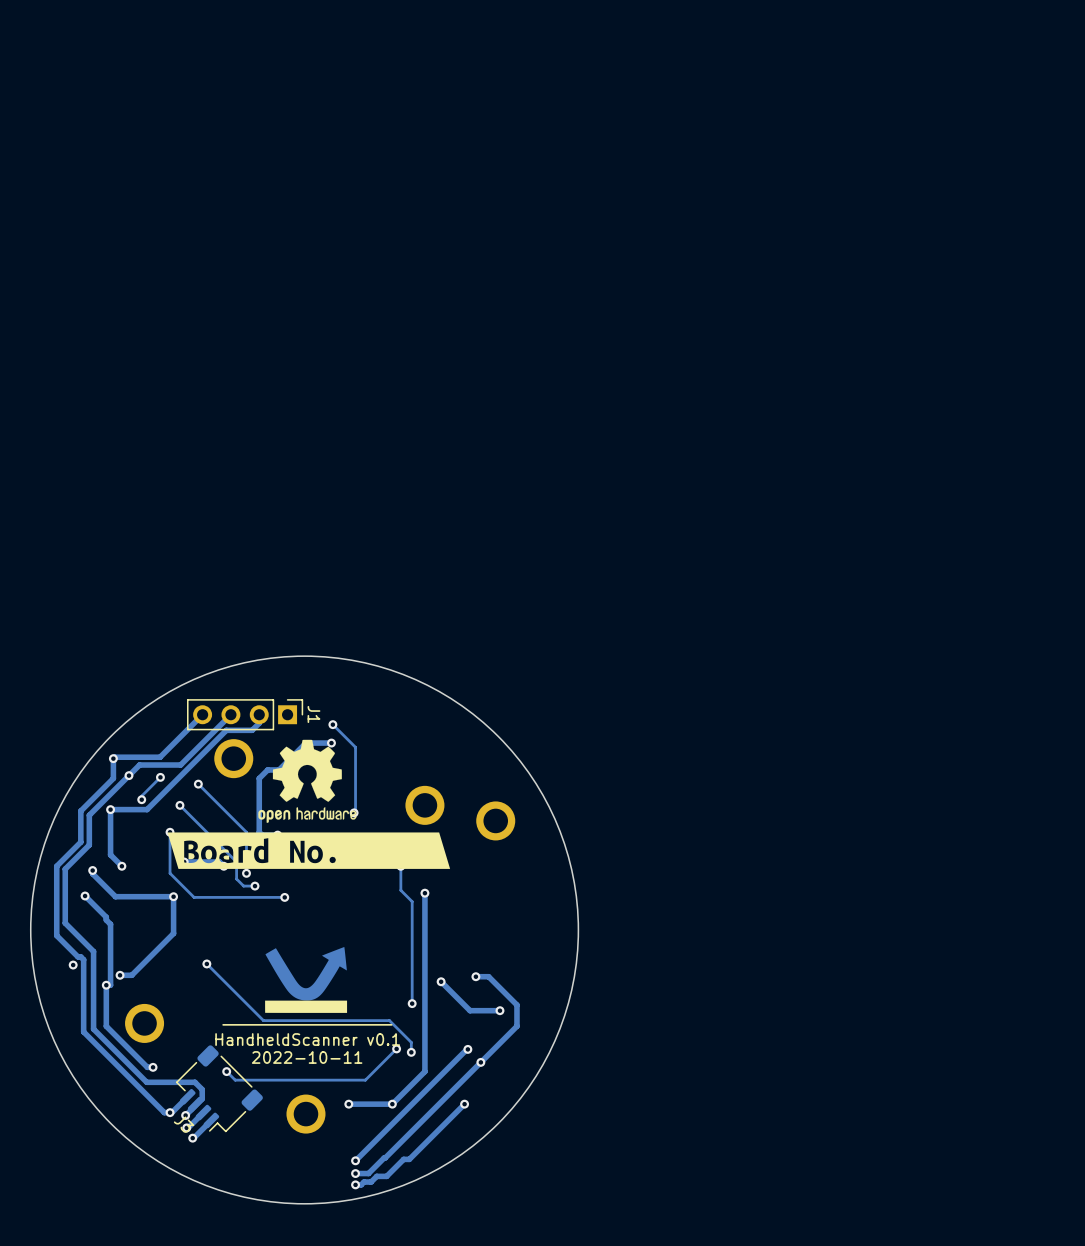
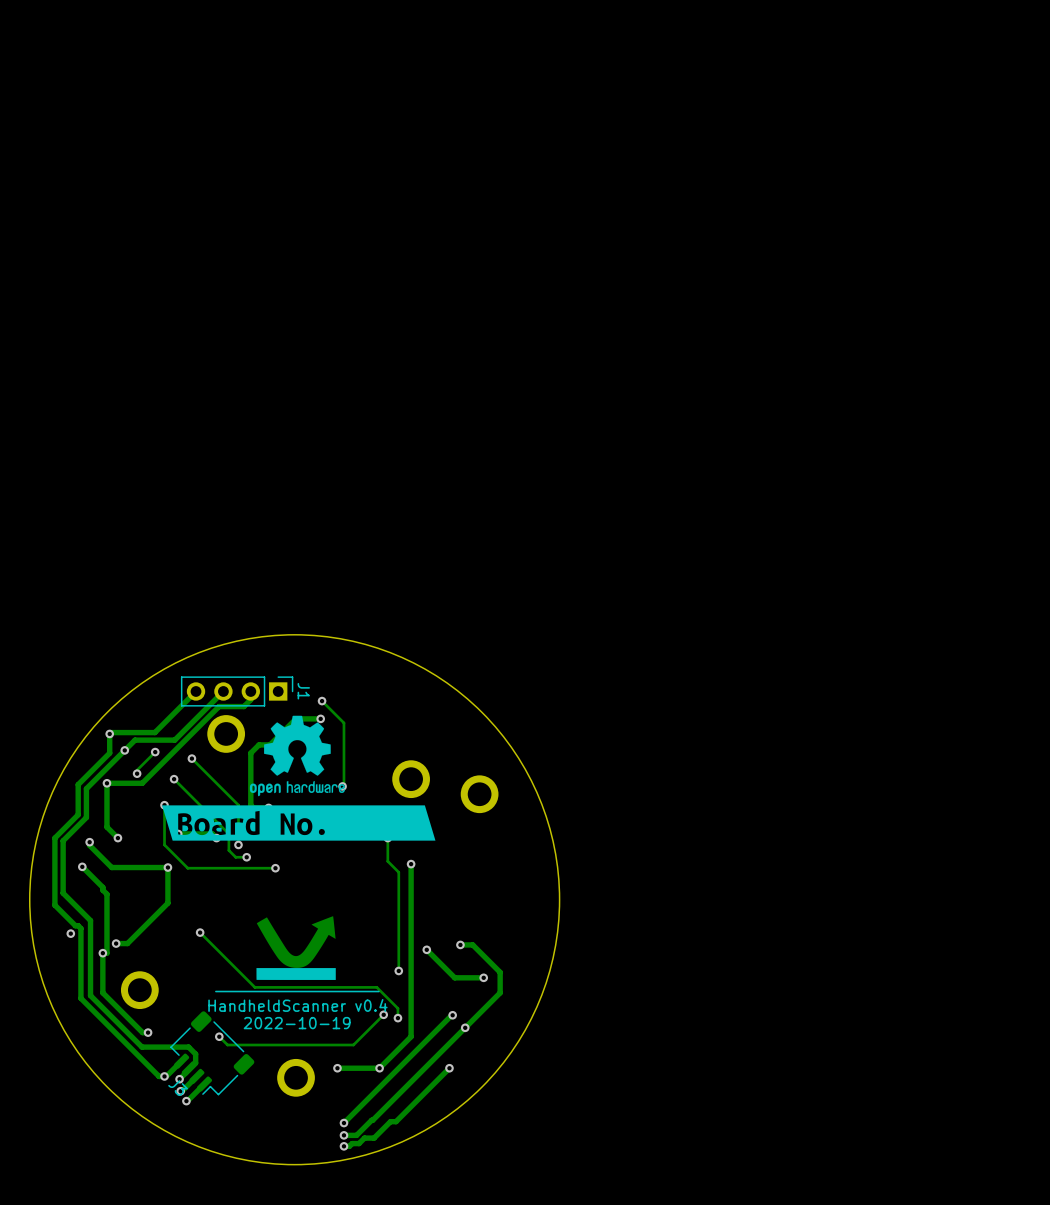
text: HandheldScanner v0.1 (307, 1039) -> HandheldScanner v0.4 (297, 1005)
text: 2022-10-11 (307, 1057) -> 2022-10-19 (297, 1023)

